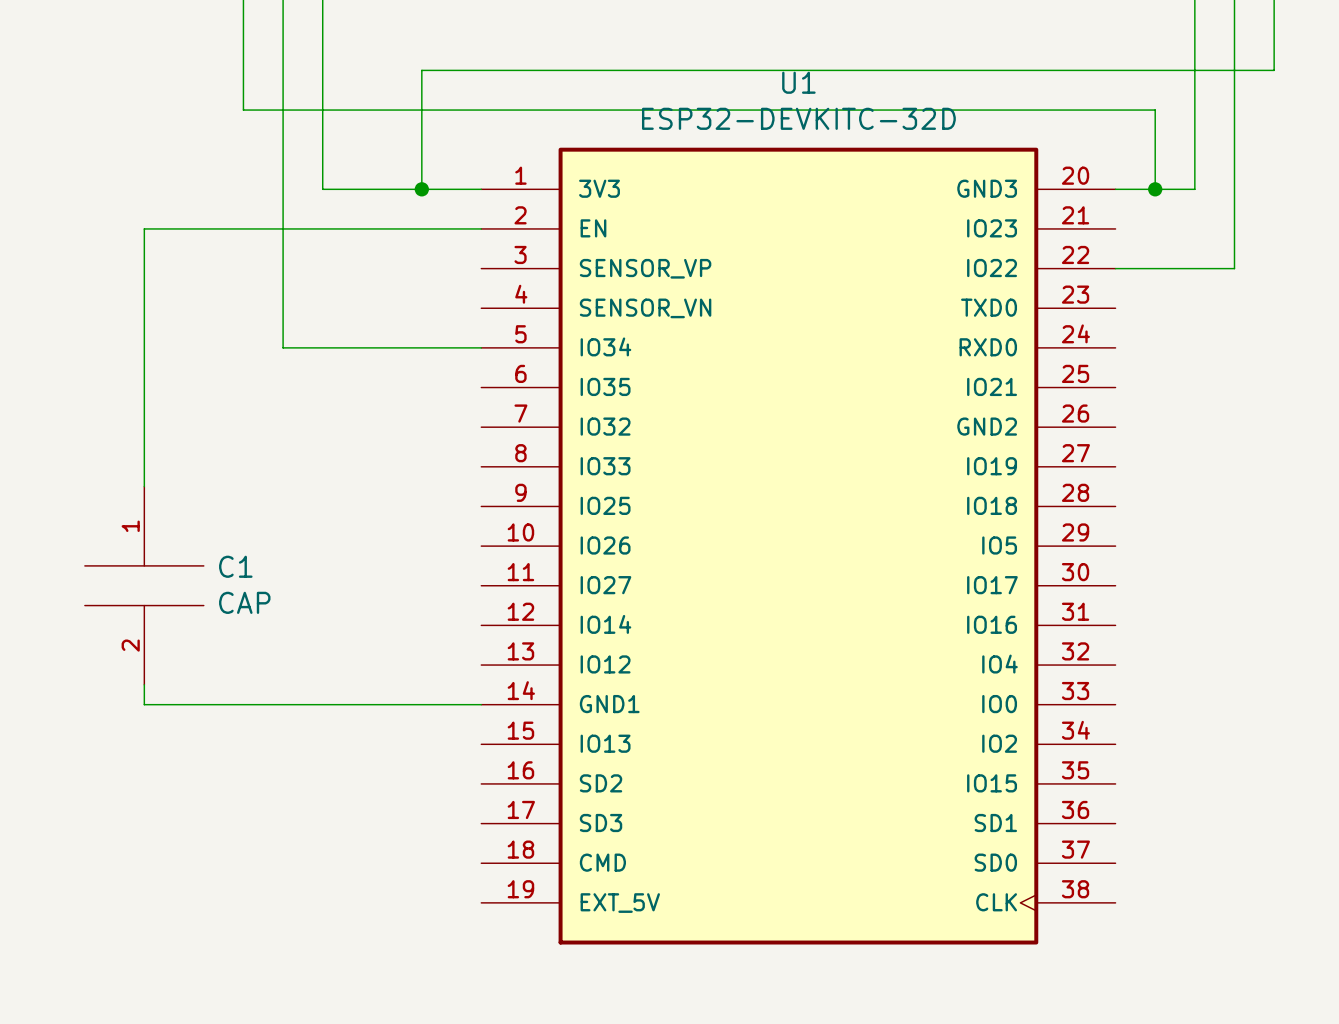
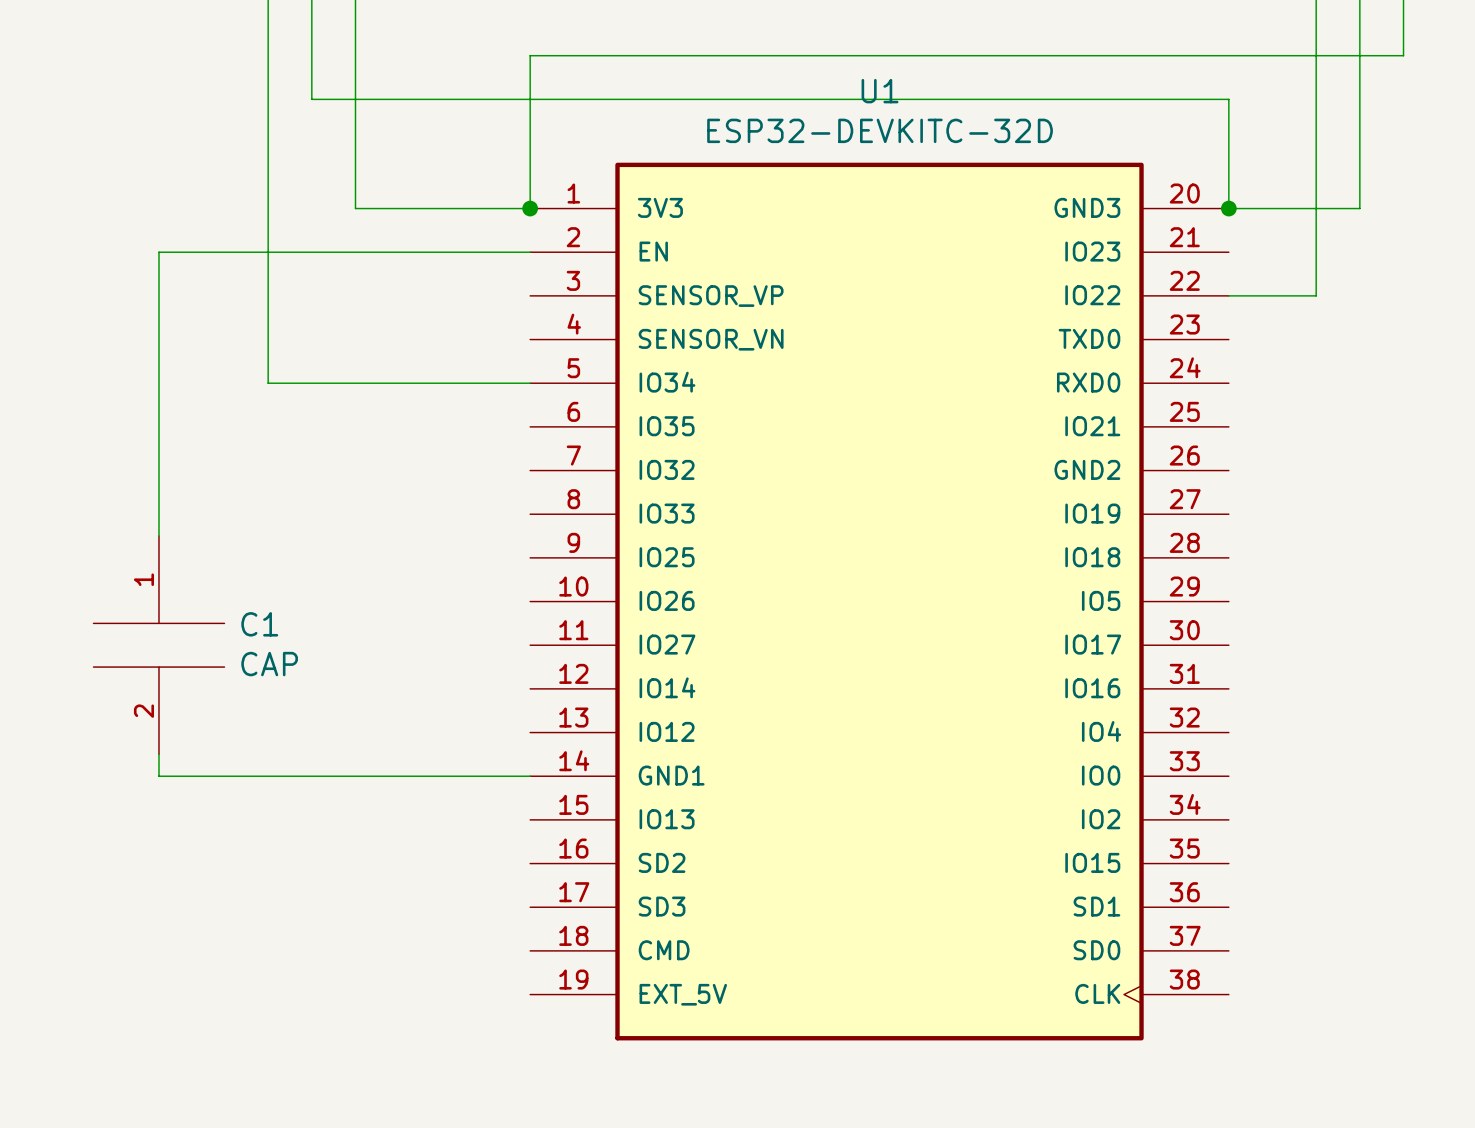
wire: (1274, 50) (1274, 70) (421, 70) (421, 189) -> (1403, 55) (530, 55) (530, 208)
wire: (283, 90) (283, 347) -> (268, 121) (268, 383) (311, 383)
wire: none -> (311, 99) (1228, 99) (1228, 208)
wire: (243, 110) (1155, 110) (1155, 189) -> none
junction position: (421, 189) -> (530, 208)
junction position: (1155, 189) -> (1228, 208)
wire: (1234, 189) (1234, 268) (1194, 268) -> (1359, 208) (1316, 208) (1316, 295)

